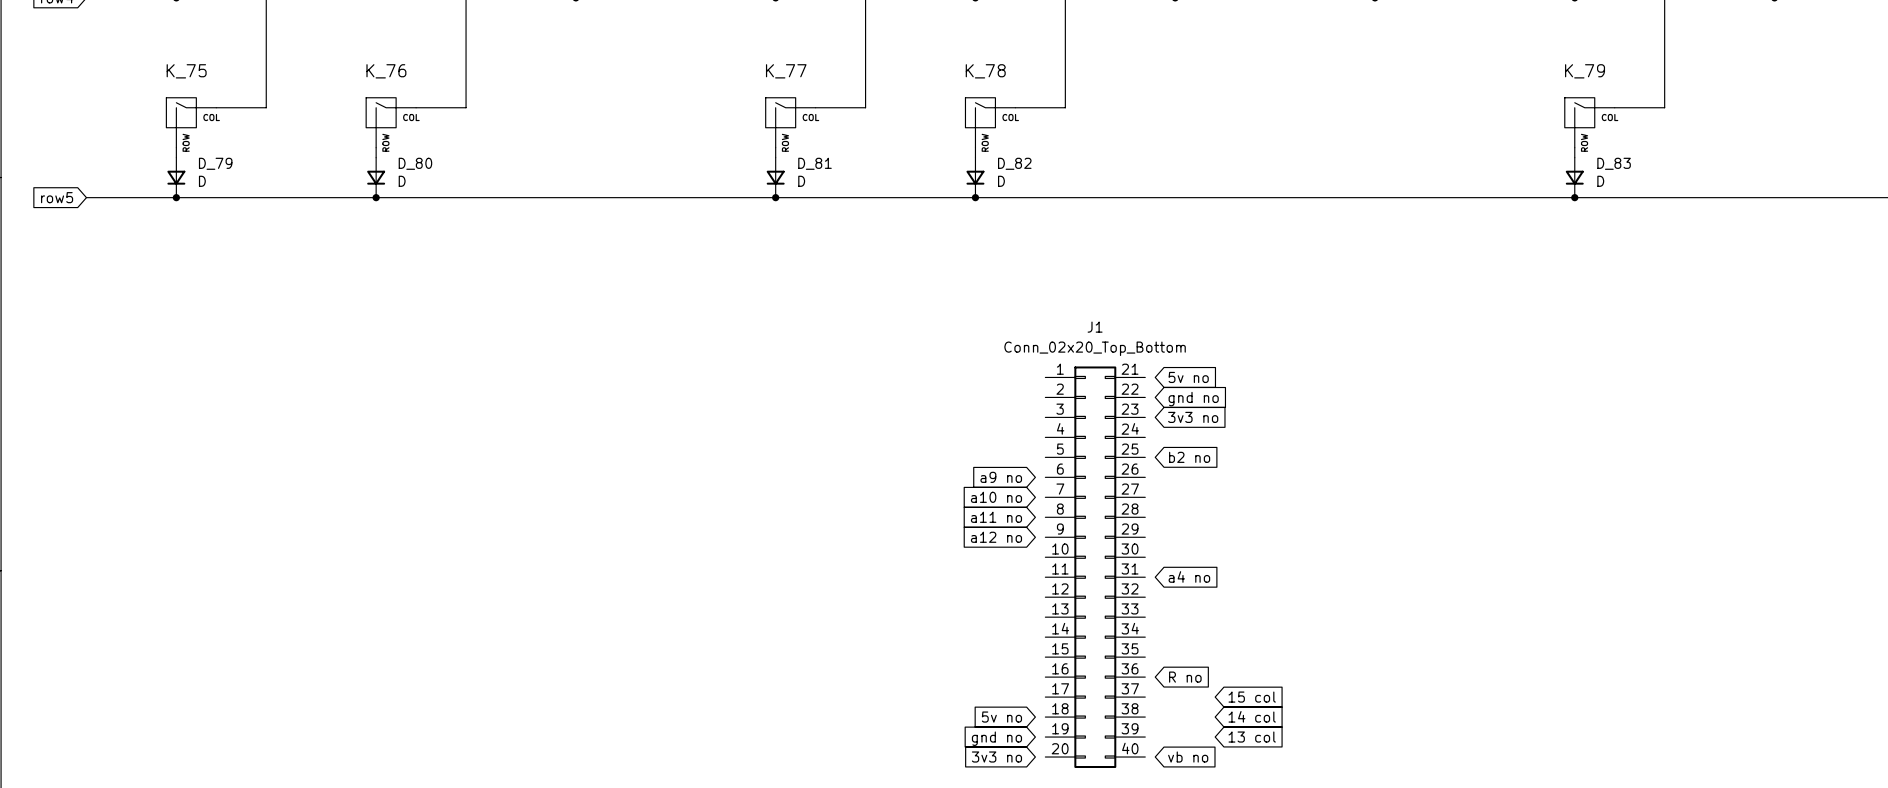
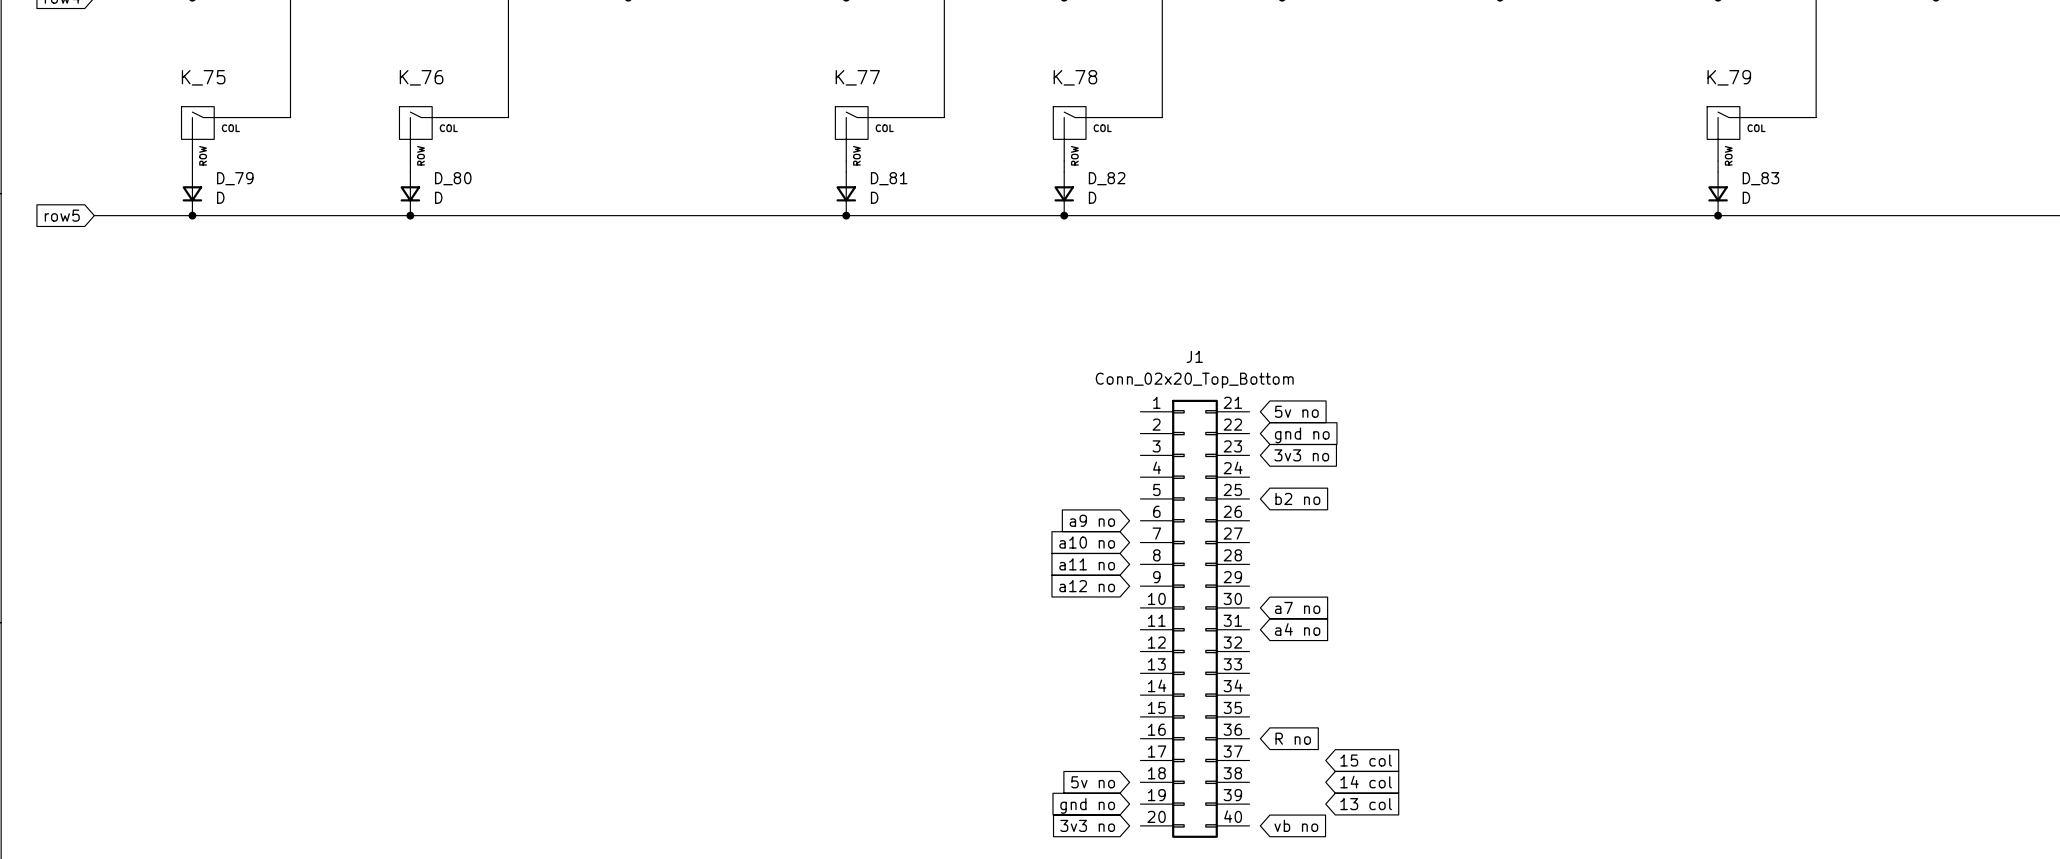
global label: none -> a7 no (1297, 607)

